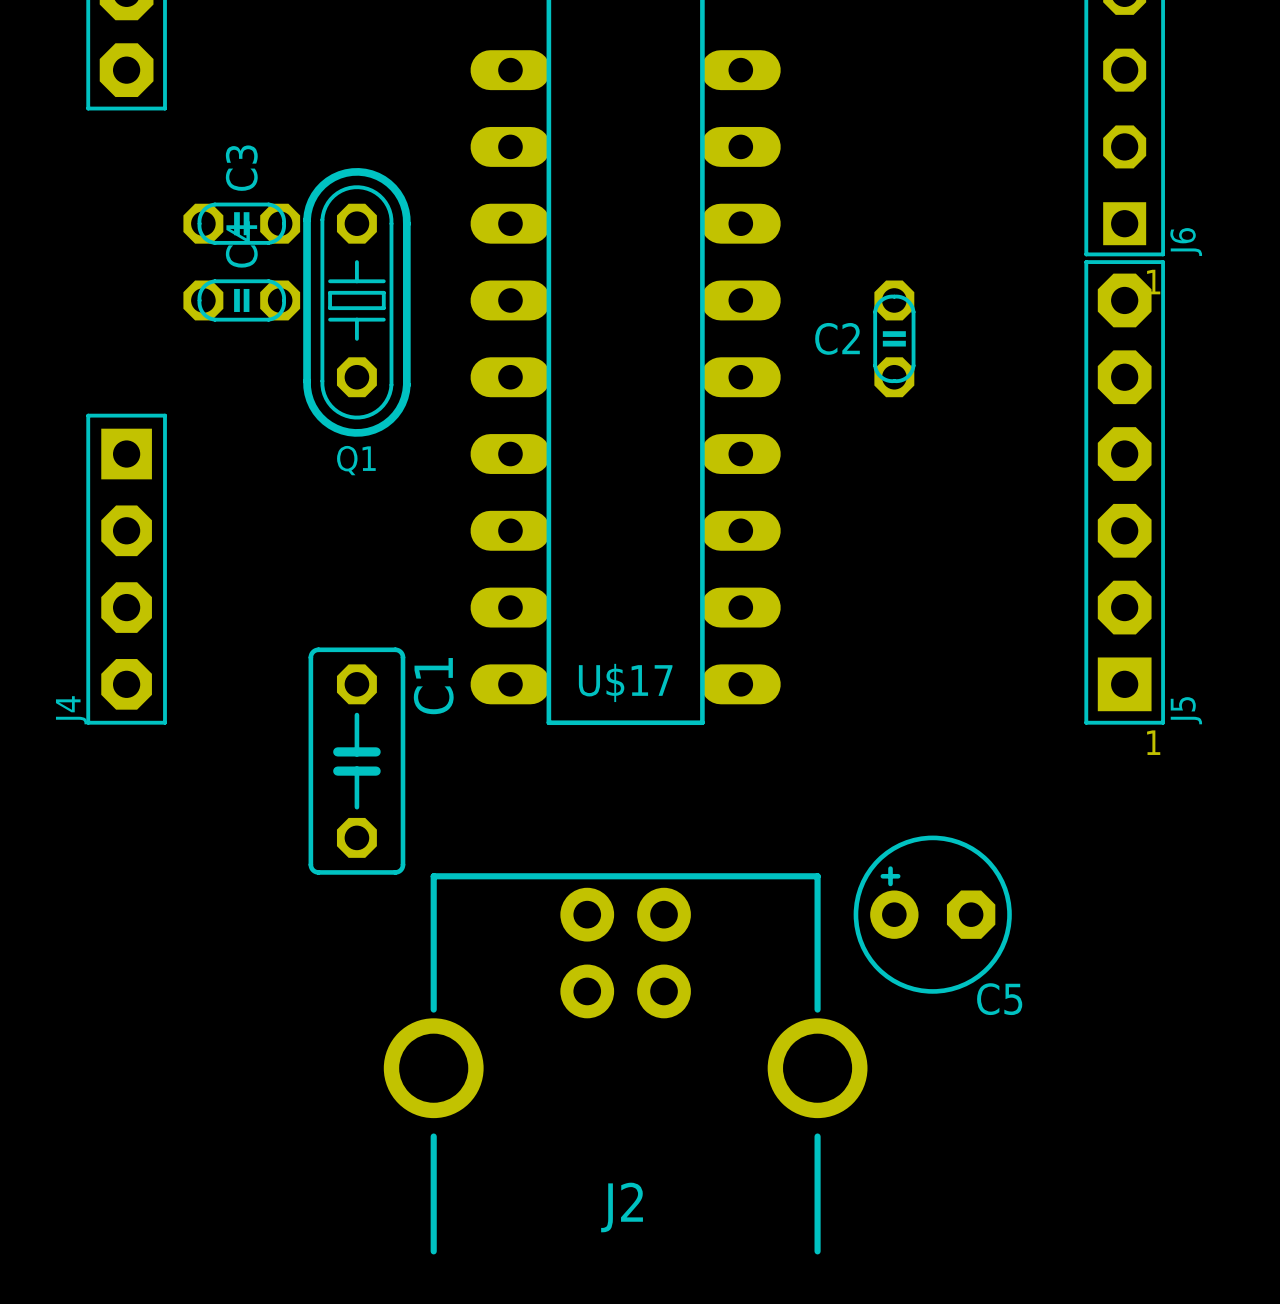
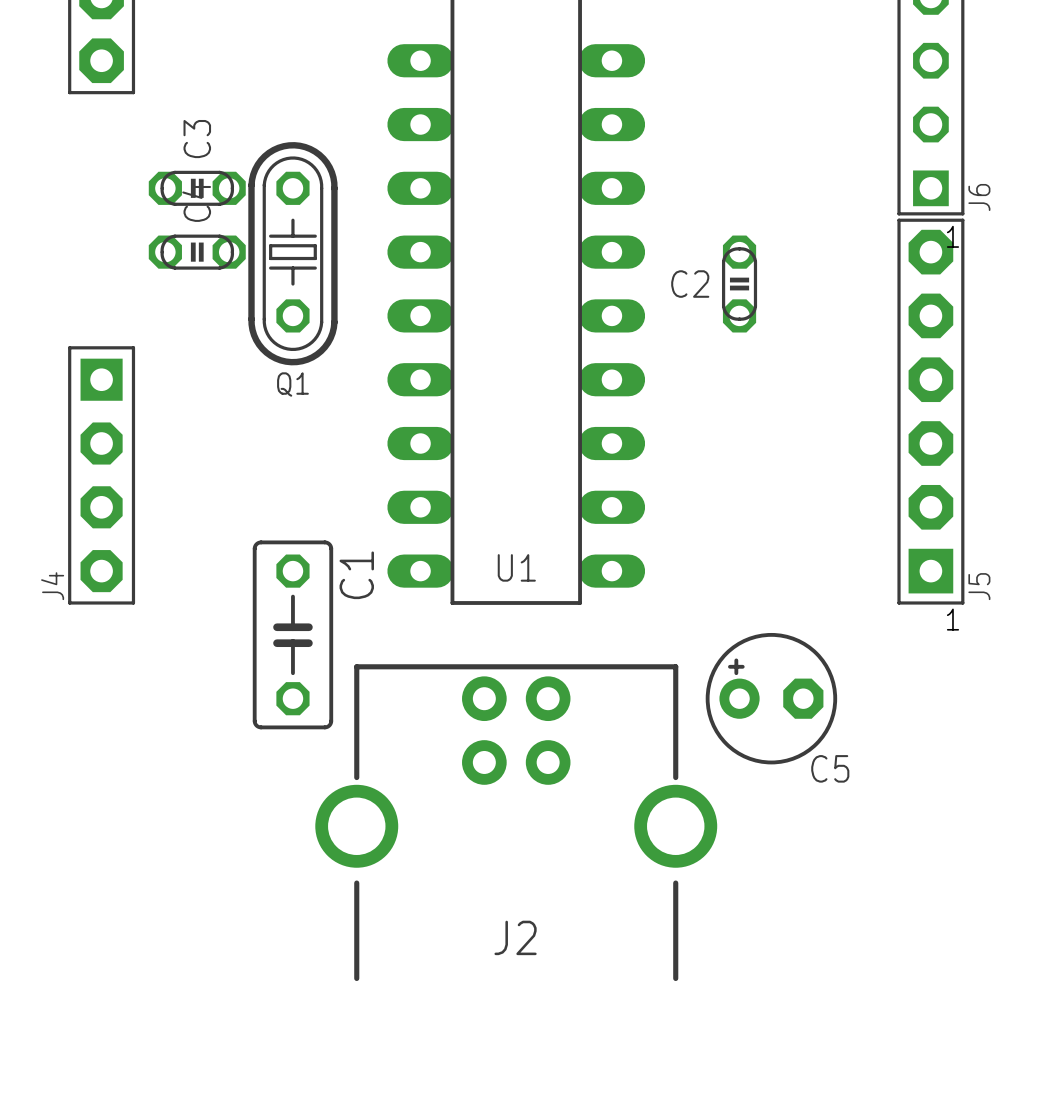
U$17 name: U$17 (625, 682) -> U1 (516, 567)
C5 position: (932, 914) -> (771, 698)
J2 position: (625, 1063) -> (516, 822)

